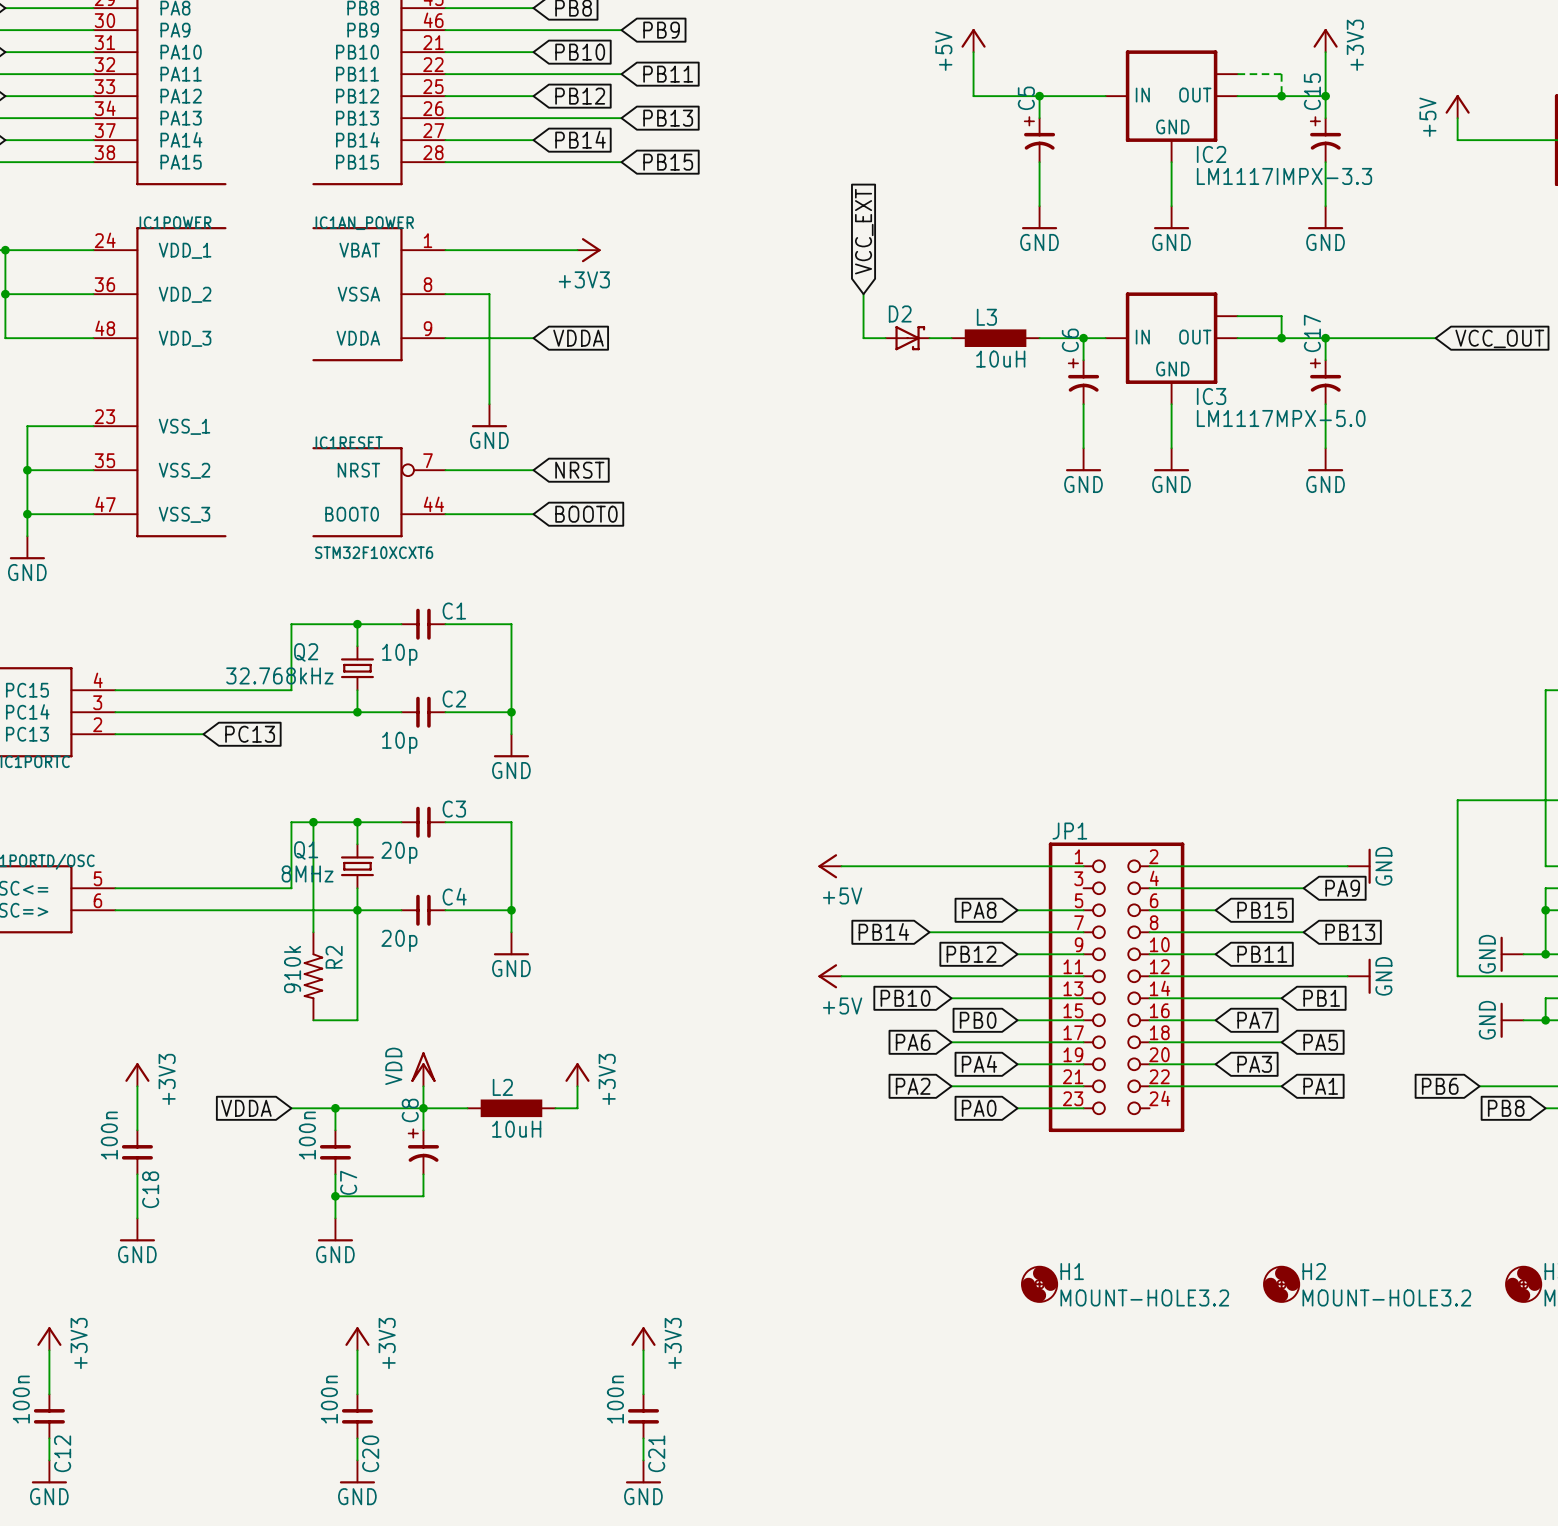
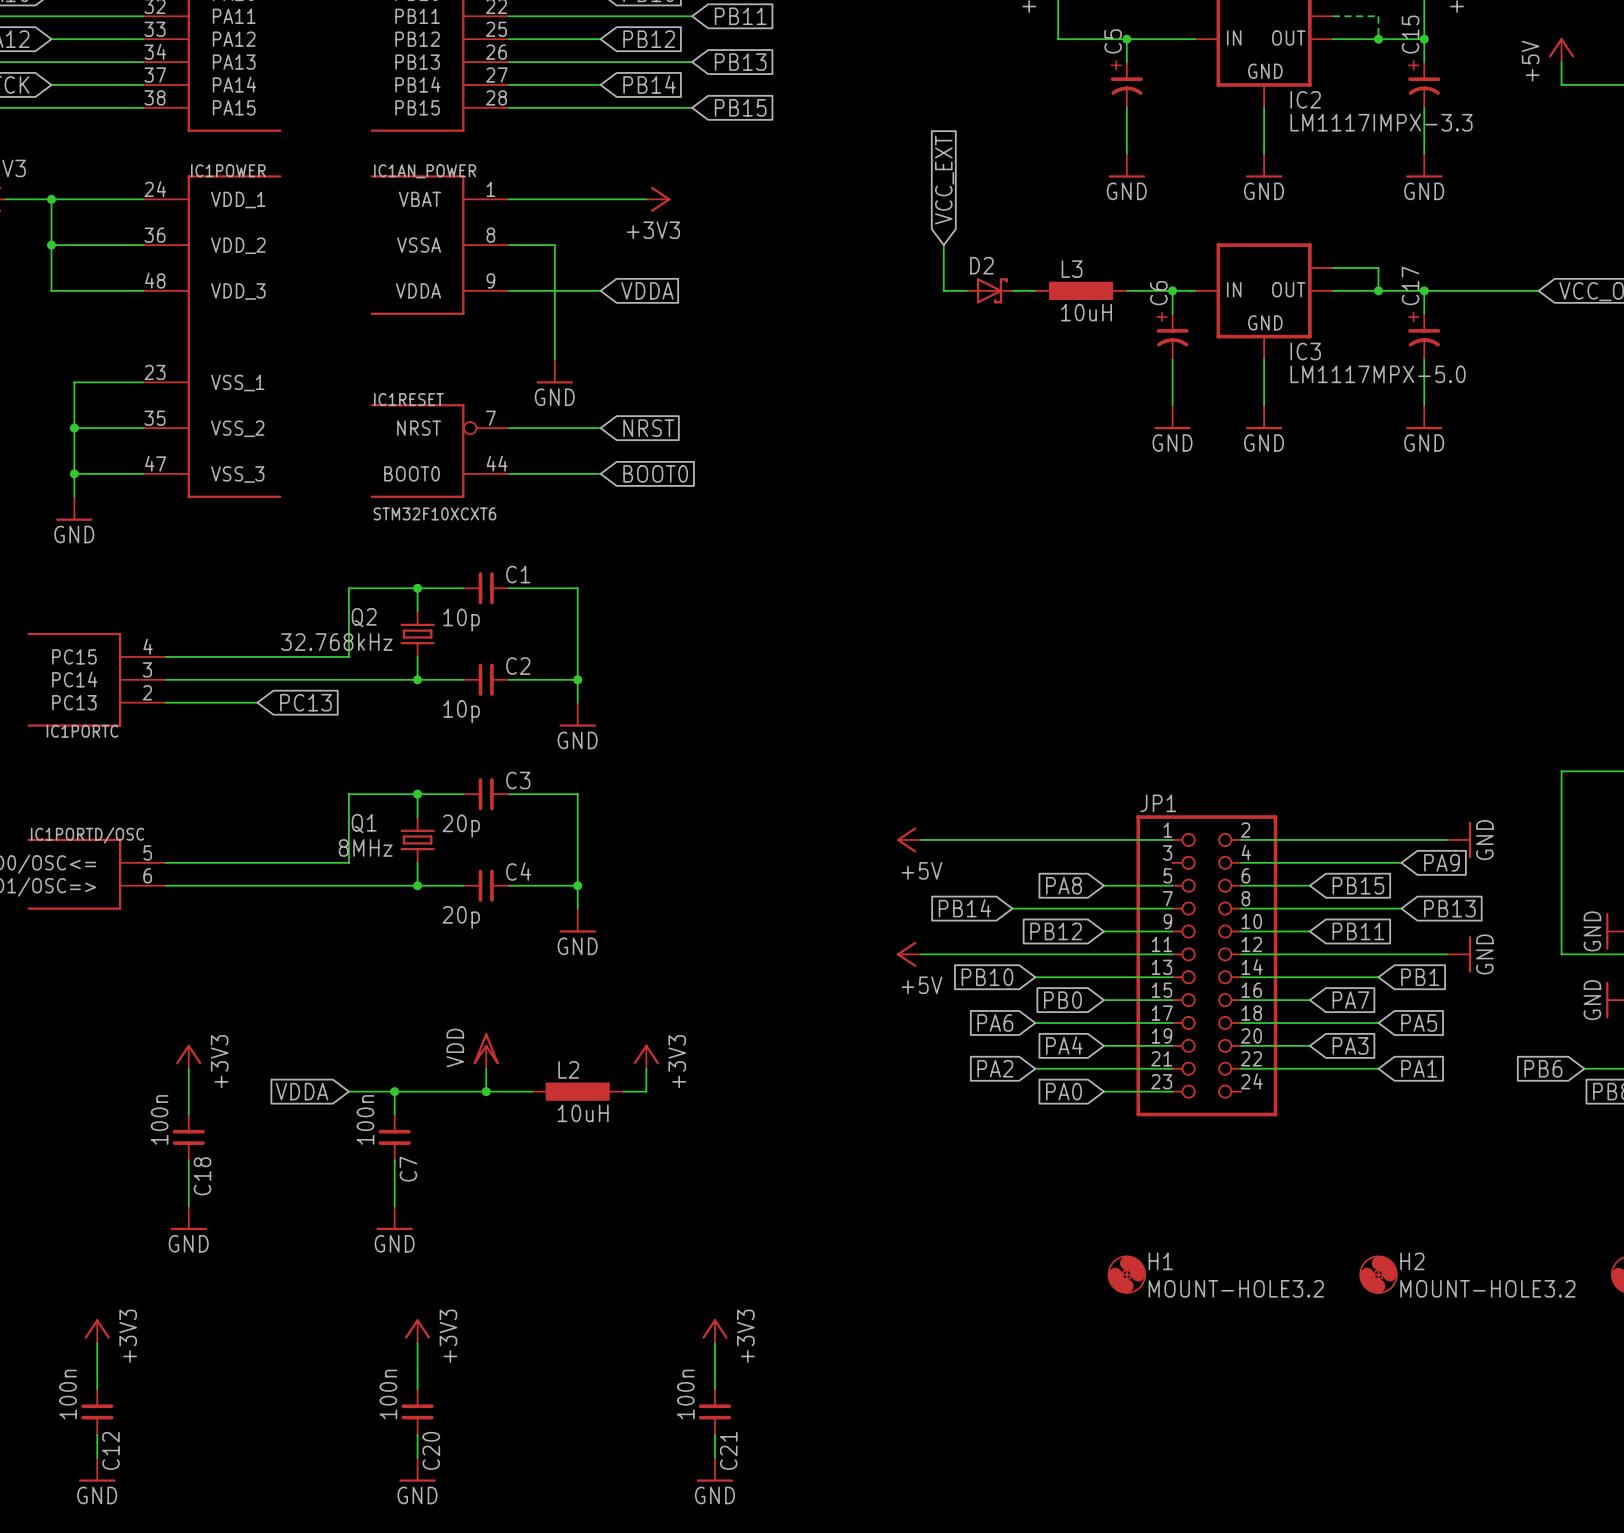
wire: (313, 822) (313, 932) -> none
junction: (313, 822) -> none
wire: (357, 910) (357, 1020) (313, 1020) -> none
R2: 910k (313, 976) -> none
wire: (423, 1108) (423, 1130) -> none
C8: (423, 1152) -> none
wire: (423, 1174) (423, 1196) (335, 1196) -> none
junction: (335, 1196) -> none

